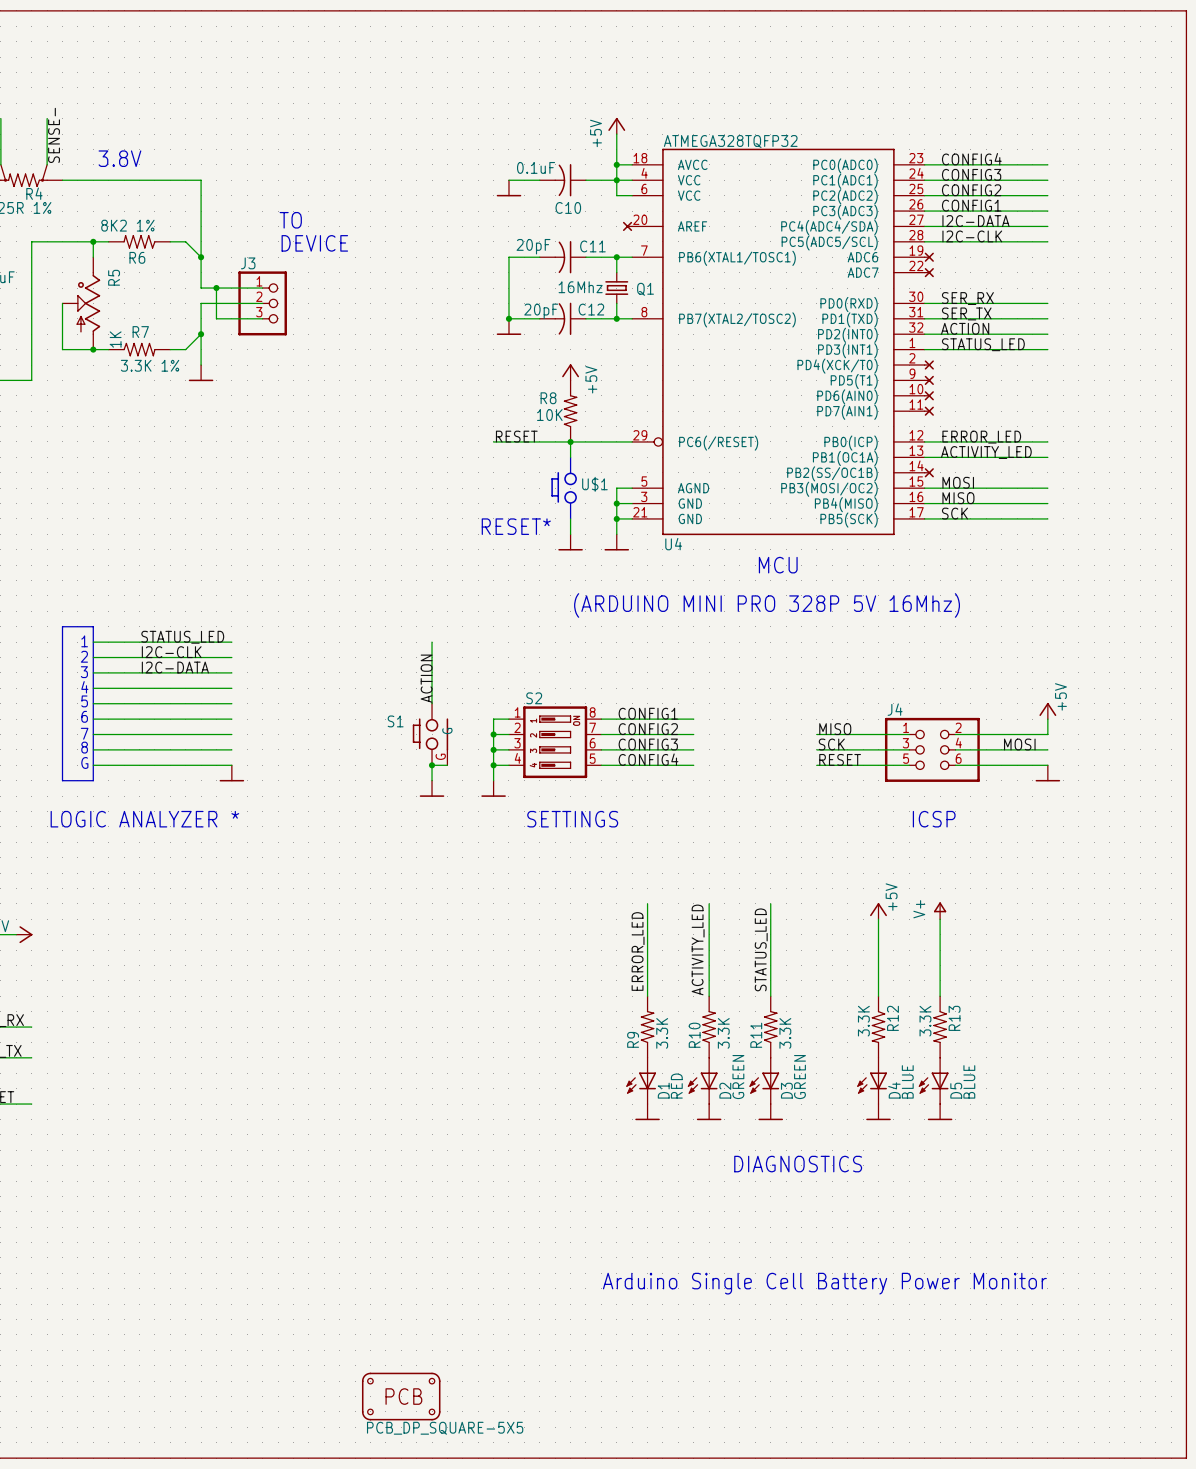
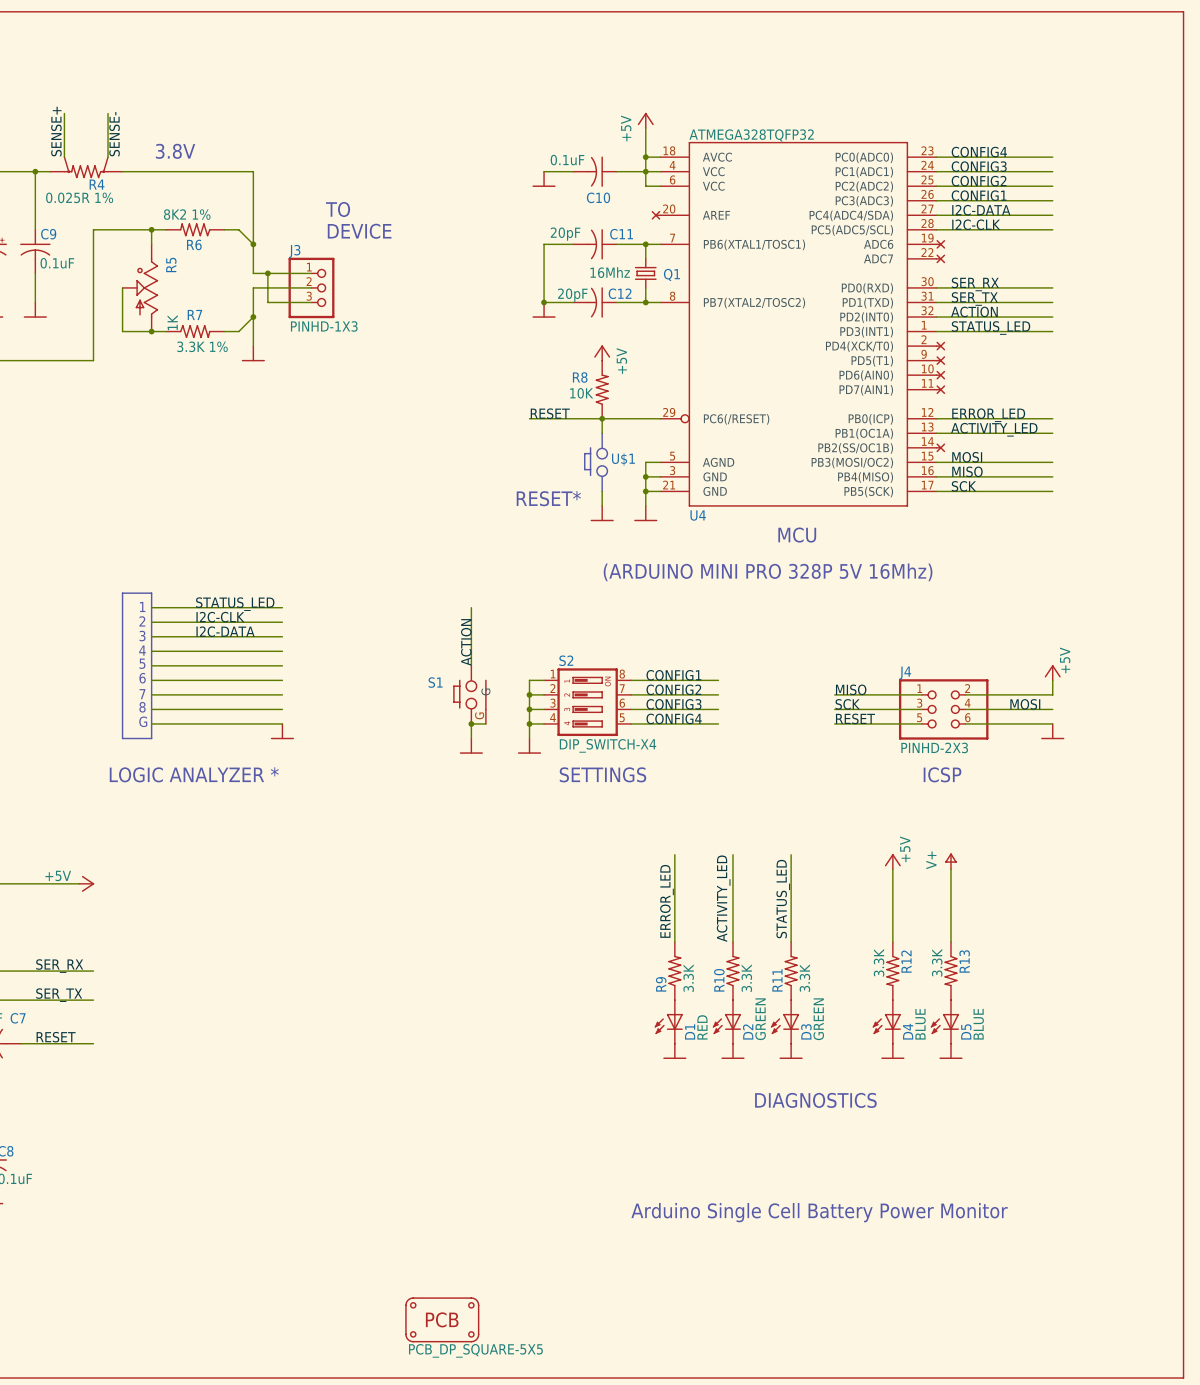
J3 value: none -> PINHD-1X3 (324, 326)
S2 value: none -> DIP_SWITCH-X4 (608, 745)
J4 value: none -> PINHD-2X3 (934, 747)

